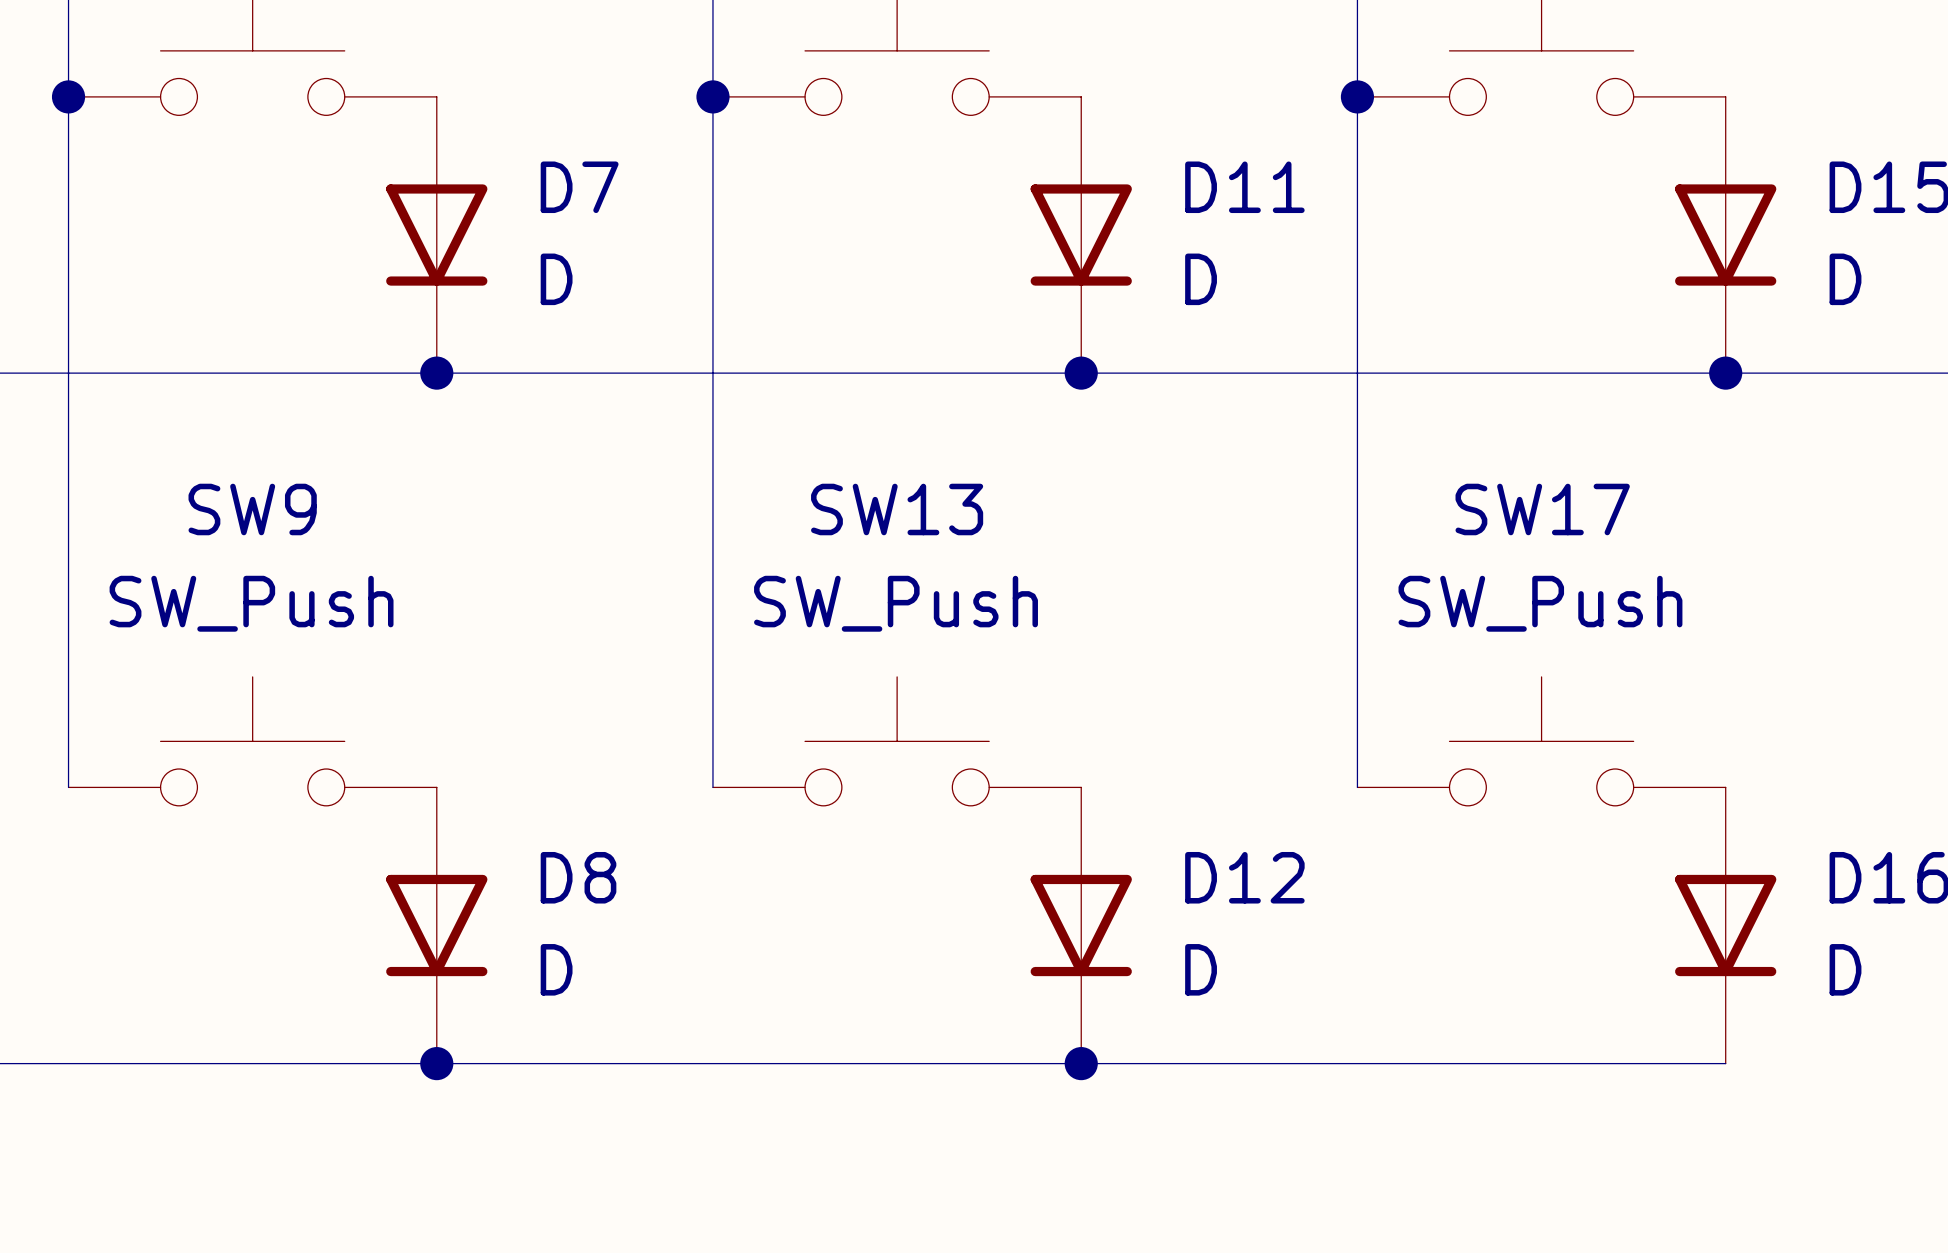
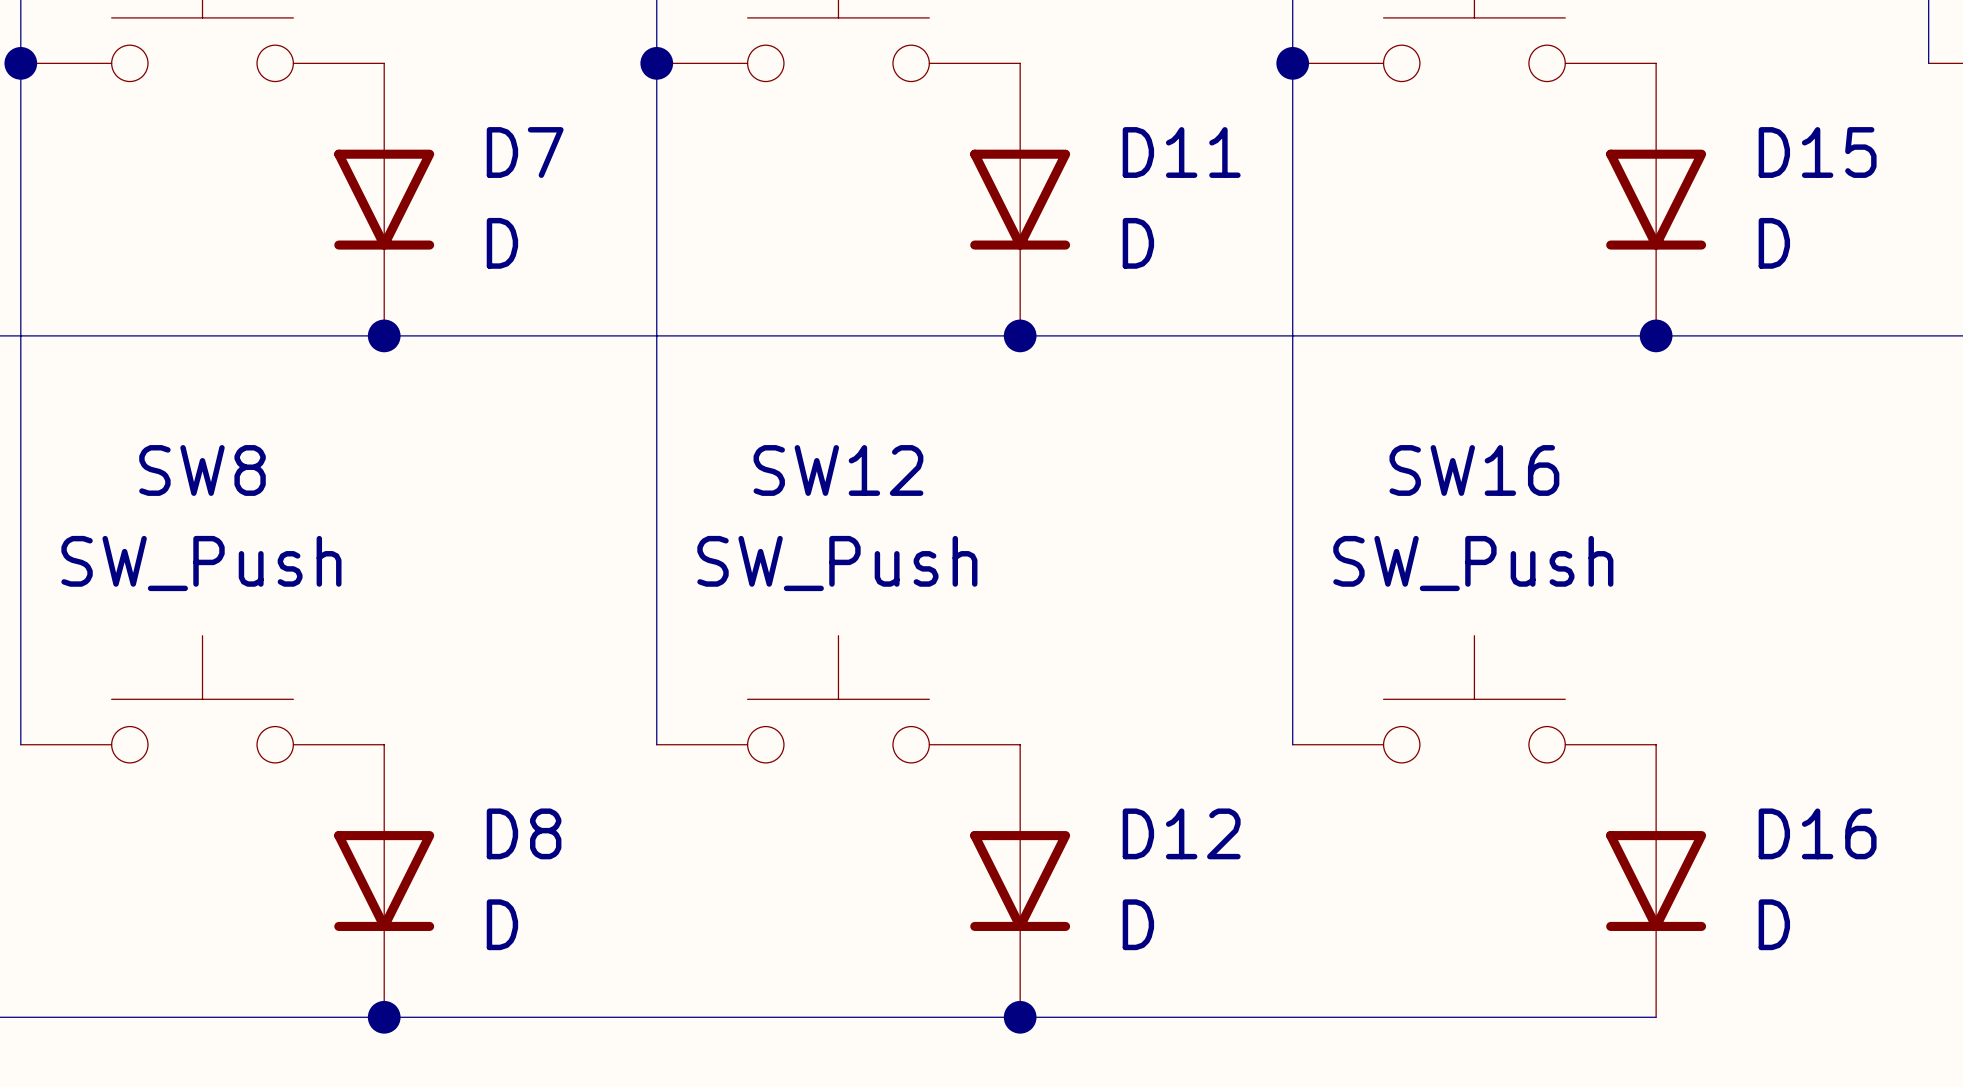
SW9 name: SW9 (252, 509) -> SW8 (202, 470)
SW13 name: SW13 (897, 509) -> SW12 (838, 470)
SW17 name: SW17 (1542, 509) -> SW16 (1474, 470)

